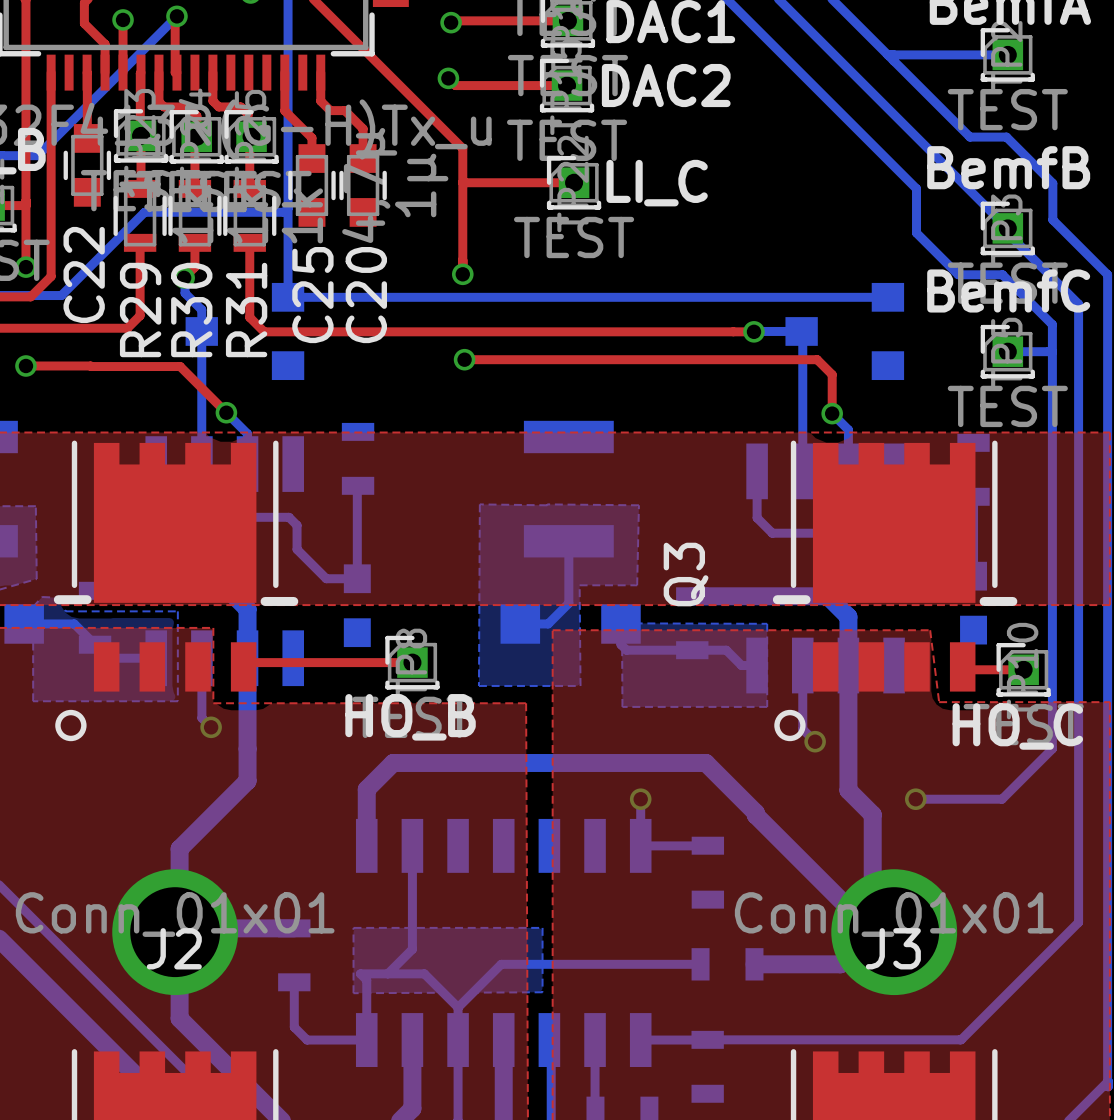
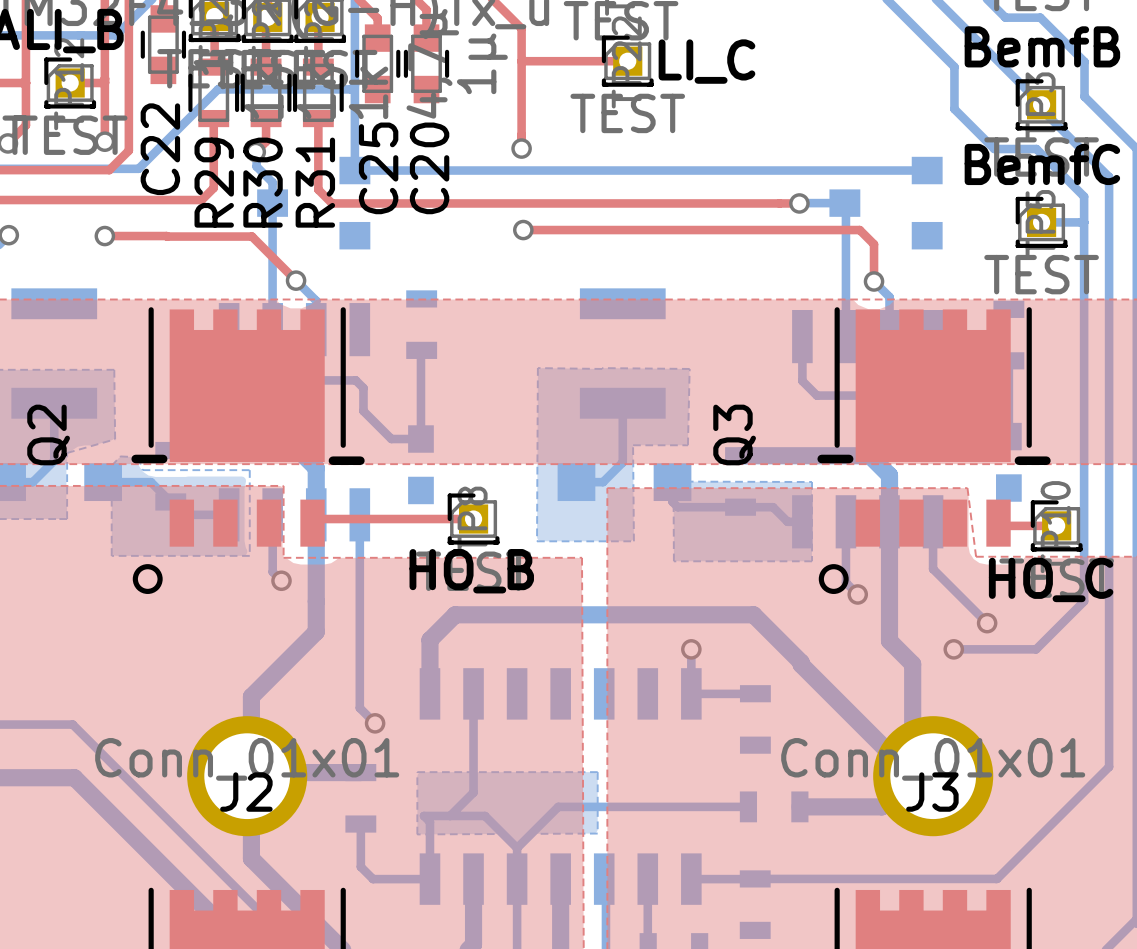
bottom track: none -> (359, 514) (359, 708) (375, 723)
bottom track: none -> (933, 521) (933, 569) (987, 623)
via: none -> (987, 623)
via: none -> (375, 723)

